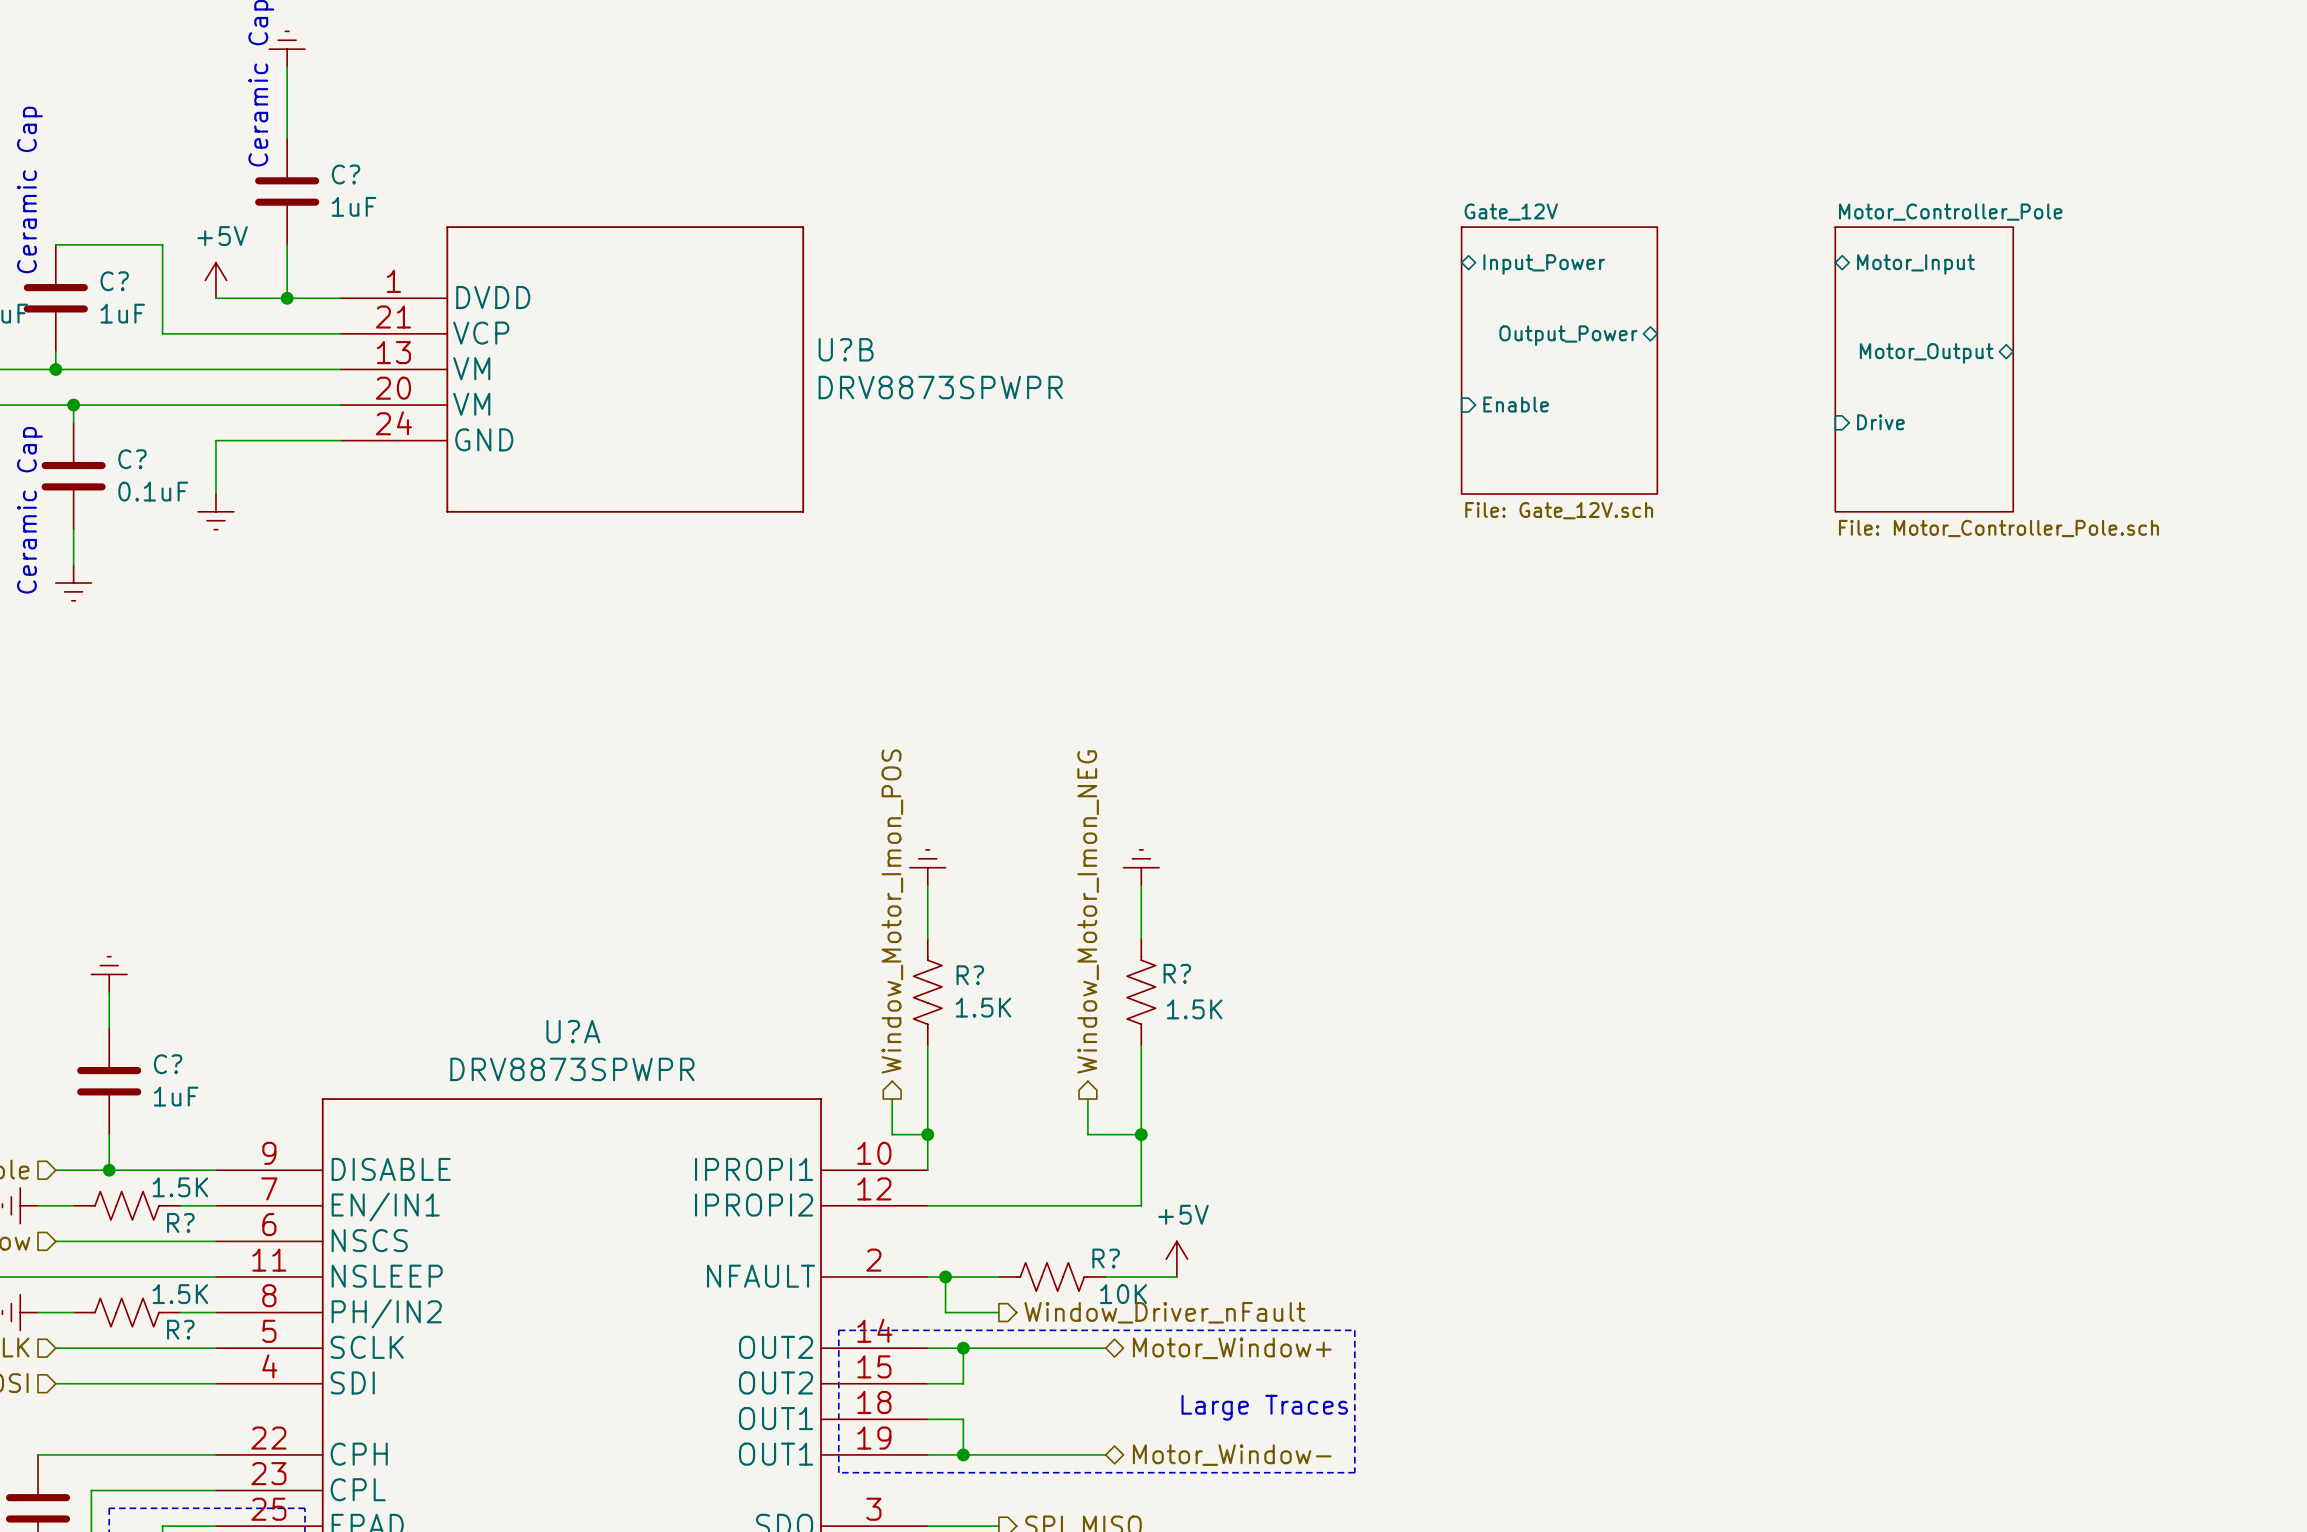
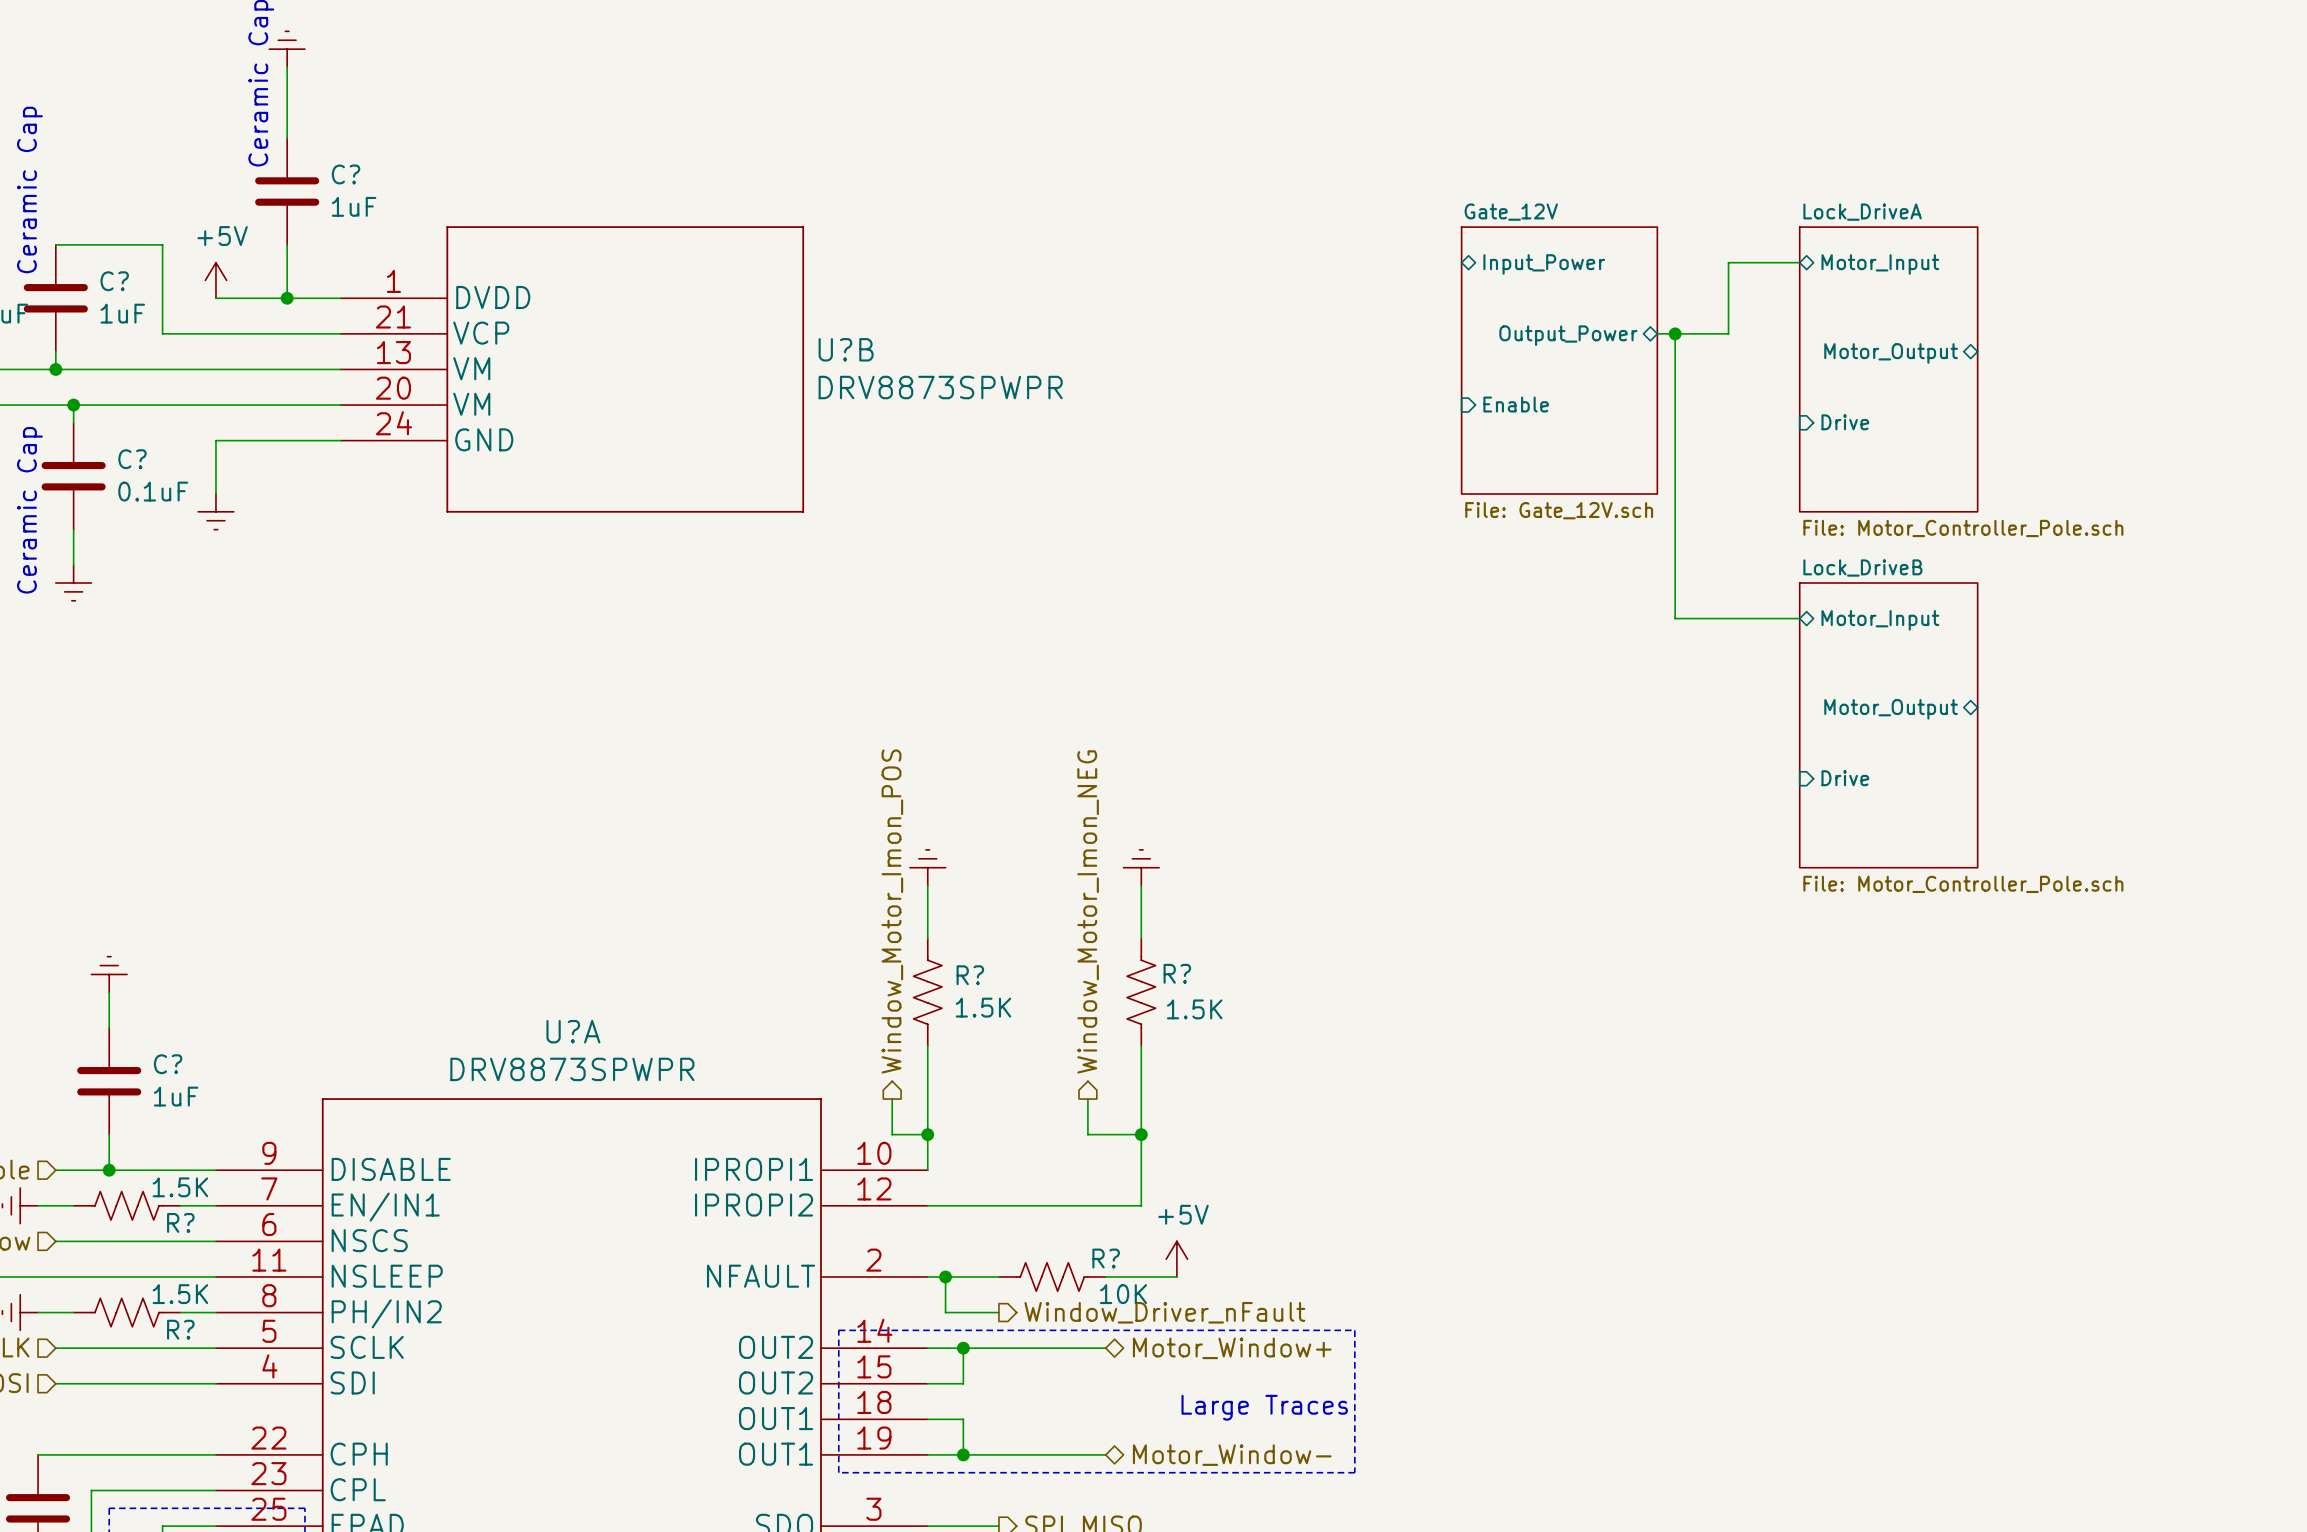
wire: none -> (1799, 262) (1728, 262) (1728, 333) (1657, 333)
sheet pin position: Motor_Input (1915, 264) -> Motor_Input (1880, 264)
wire: none -> (1675, 333) (1675, 618) (1799, 618)
junction: none -> (1675, 333)
sheet pin position: Motor_Output (1926, 353) -> Motor_Output (1891, 353)
sheet Lock_DriveA: none -> File: Motor_Controller_Pole.sch (1888, 369)
sheet Motor_Controller_Pole: File: Motor_Controller_Pole.sch (1924, 369) -> none
sheet pin position: Drive (1880, 422) -> Drive (1845, 422)
sheet pin: none -> Motor_Input (1880, 620)
sheet pin: none -> Motor_Output (1891, 709)
sheet Lock_DriveB: none -> File: Motor_Controller_Pole.sch (1888, 725)
sheet pin: none -> Drive (1845, 778)

